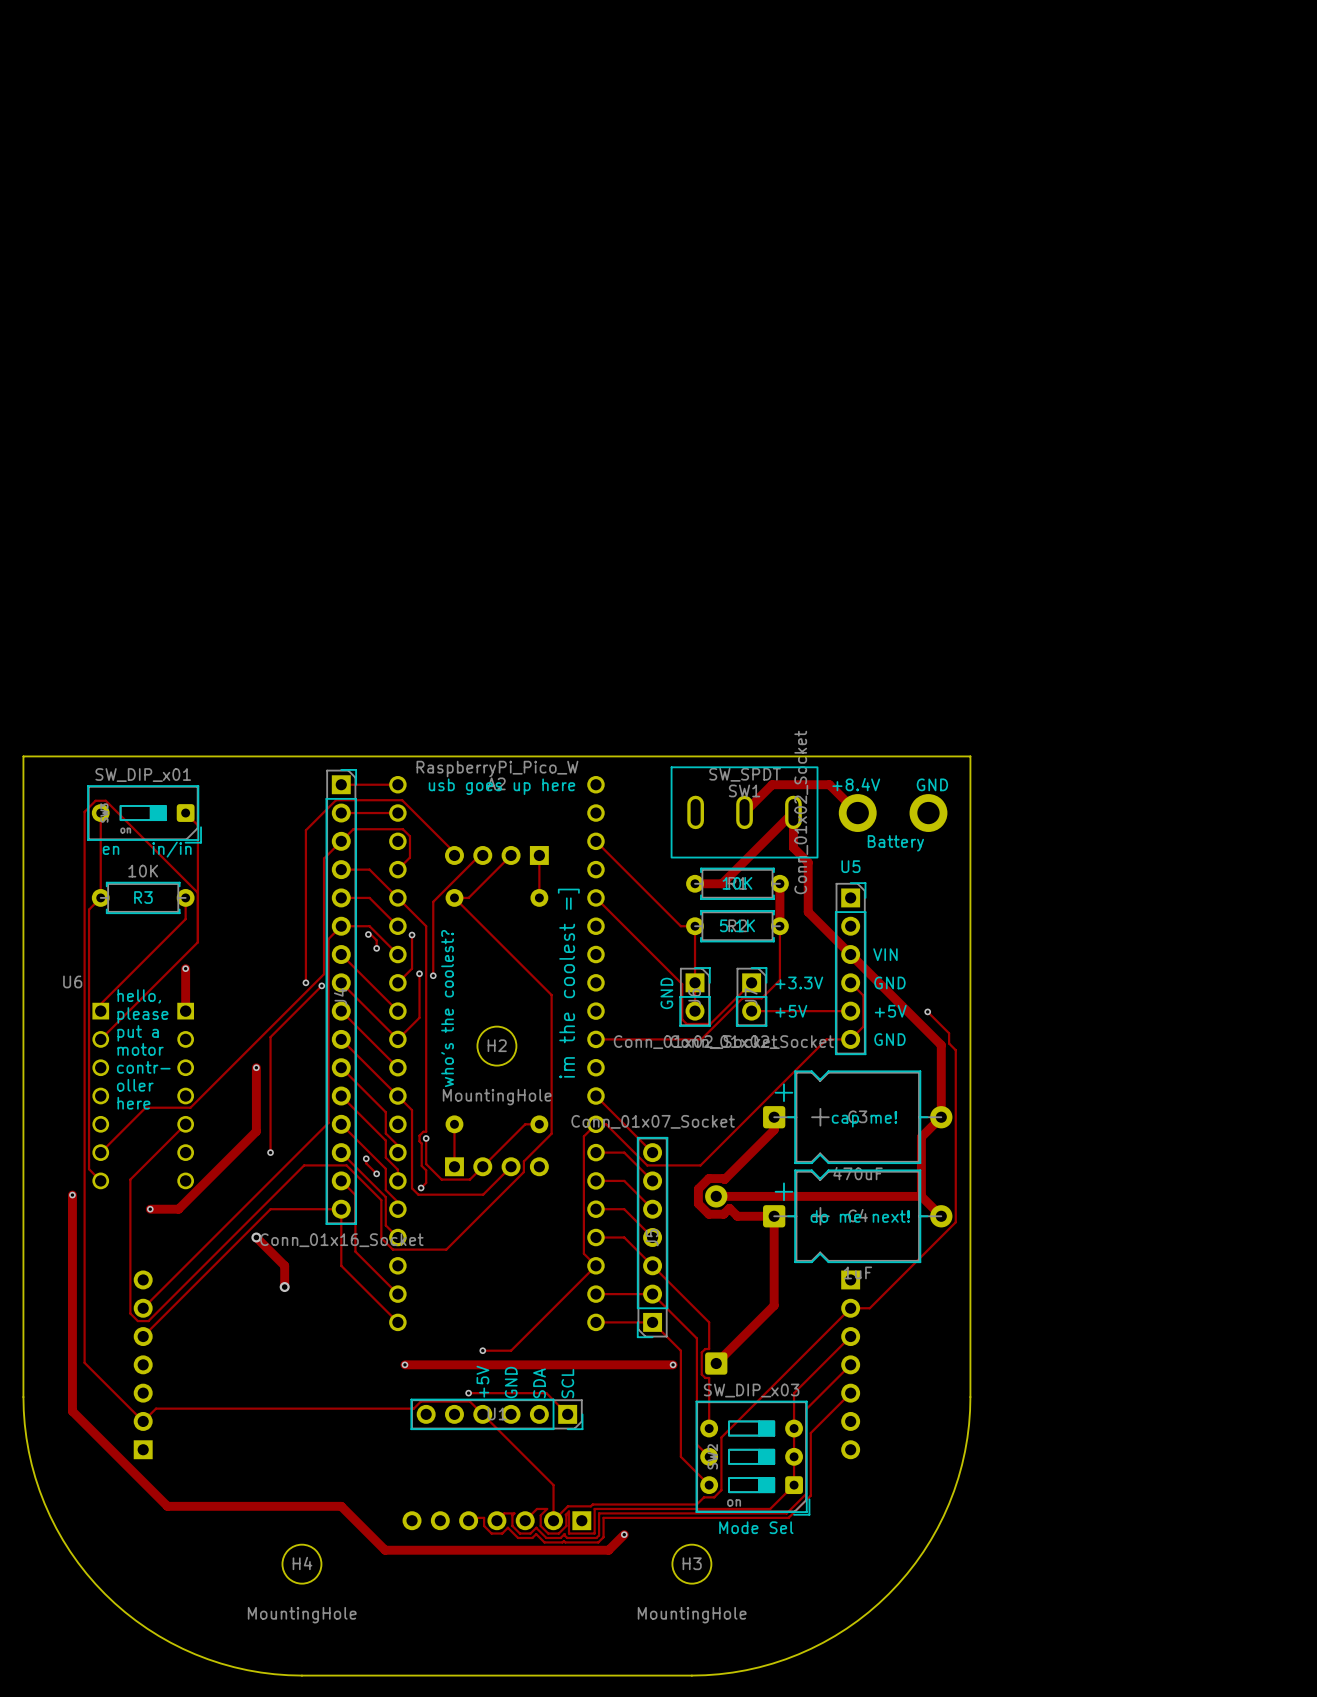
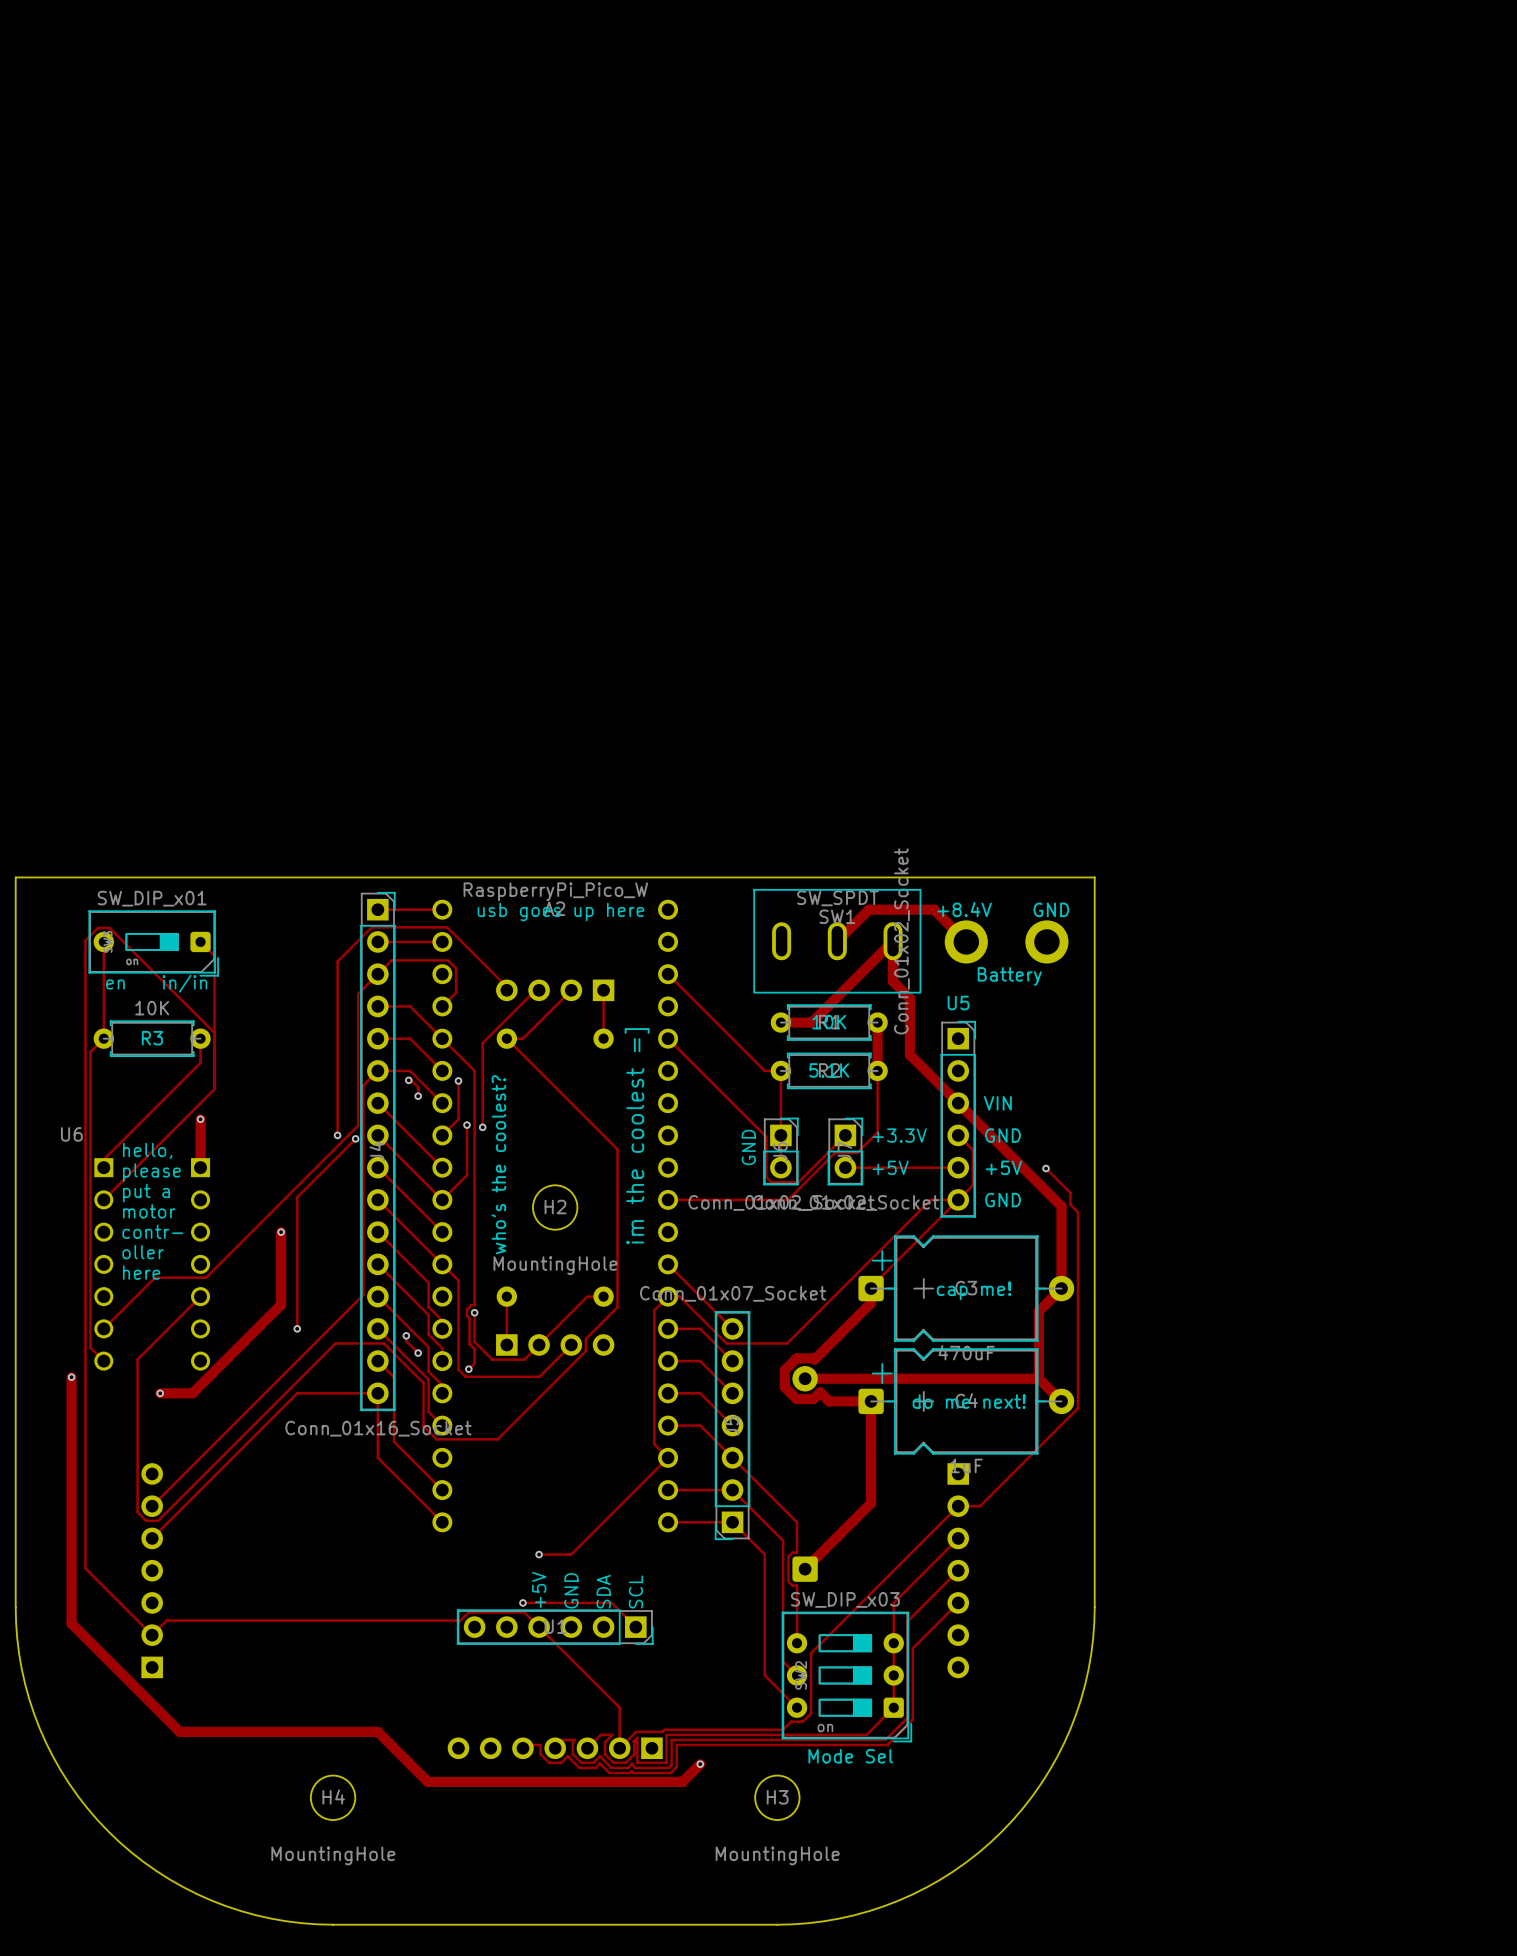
track: none -> (958, 1199) (871, 1288)
track: (256, 1237) (284, 1265) (284, 1287) -> none
via: (256, 1237) -> none
via: (284, 1287) -> none
track: (404, 1364) (673, 1364) -> none
via: (404, 1364) -> none
via: (673, 1364) -> none

